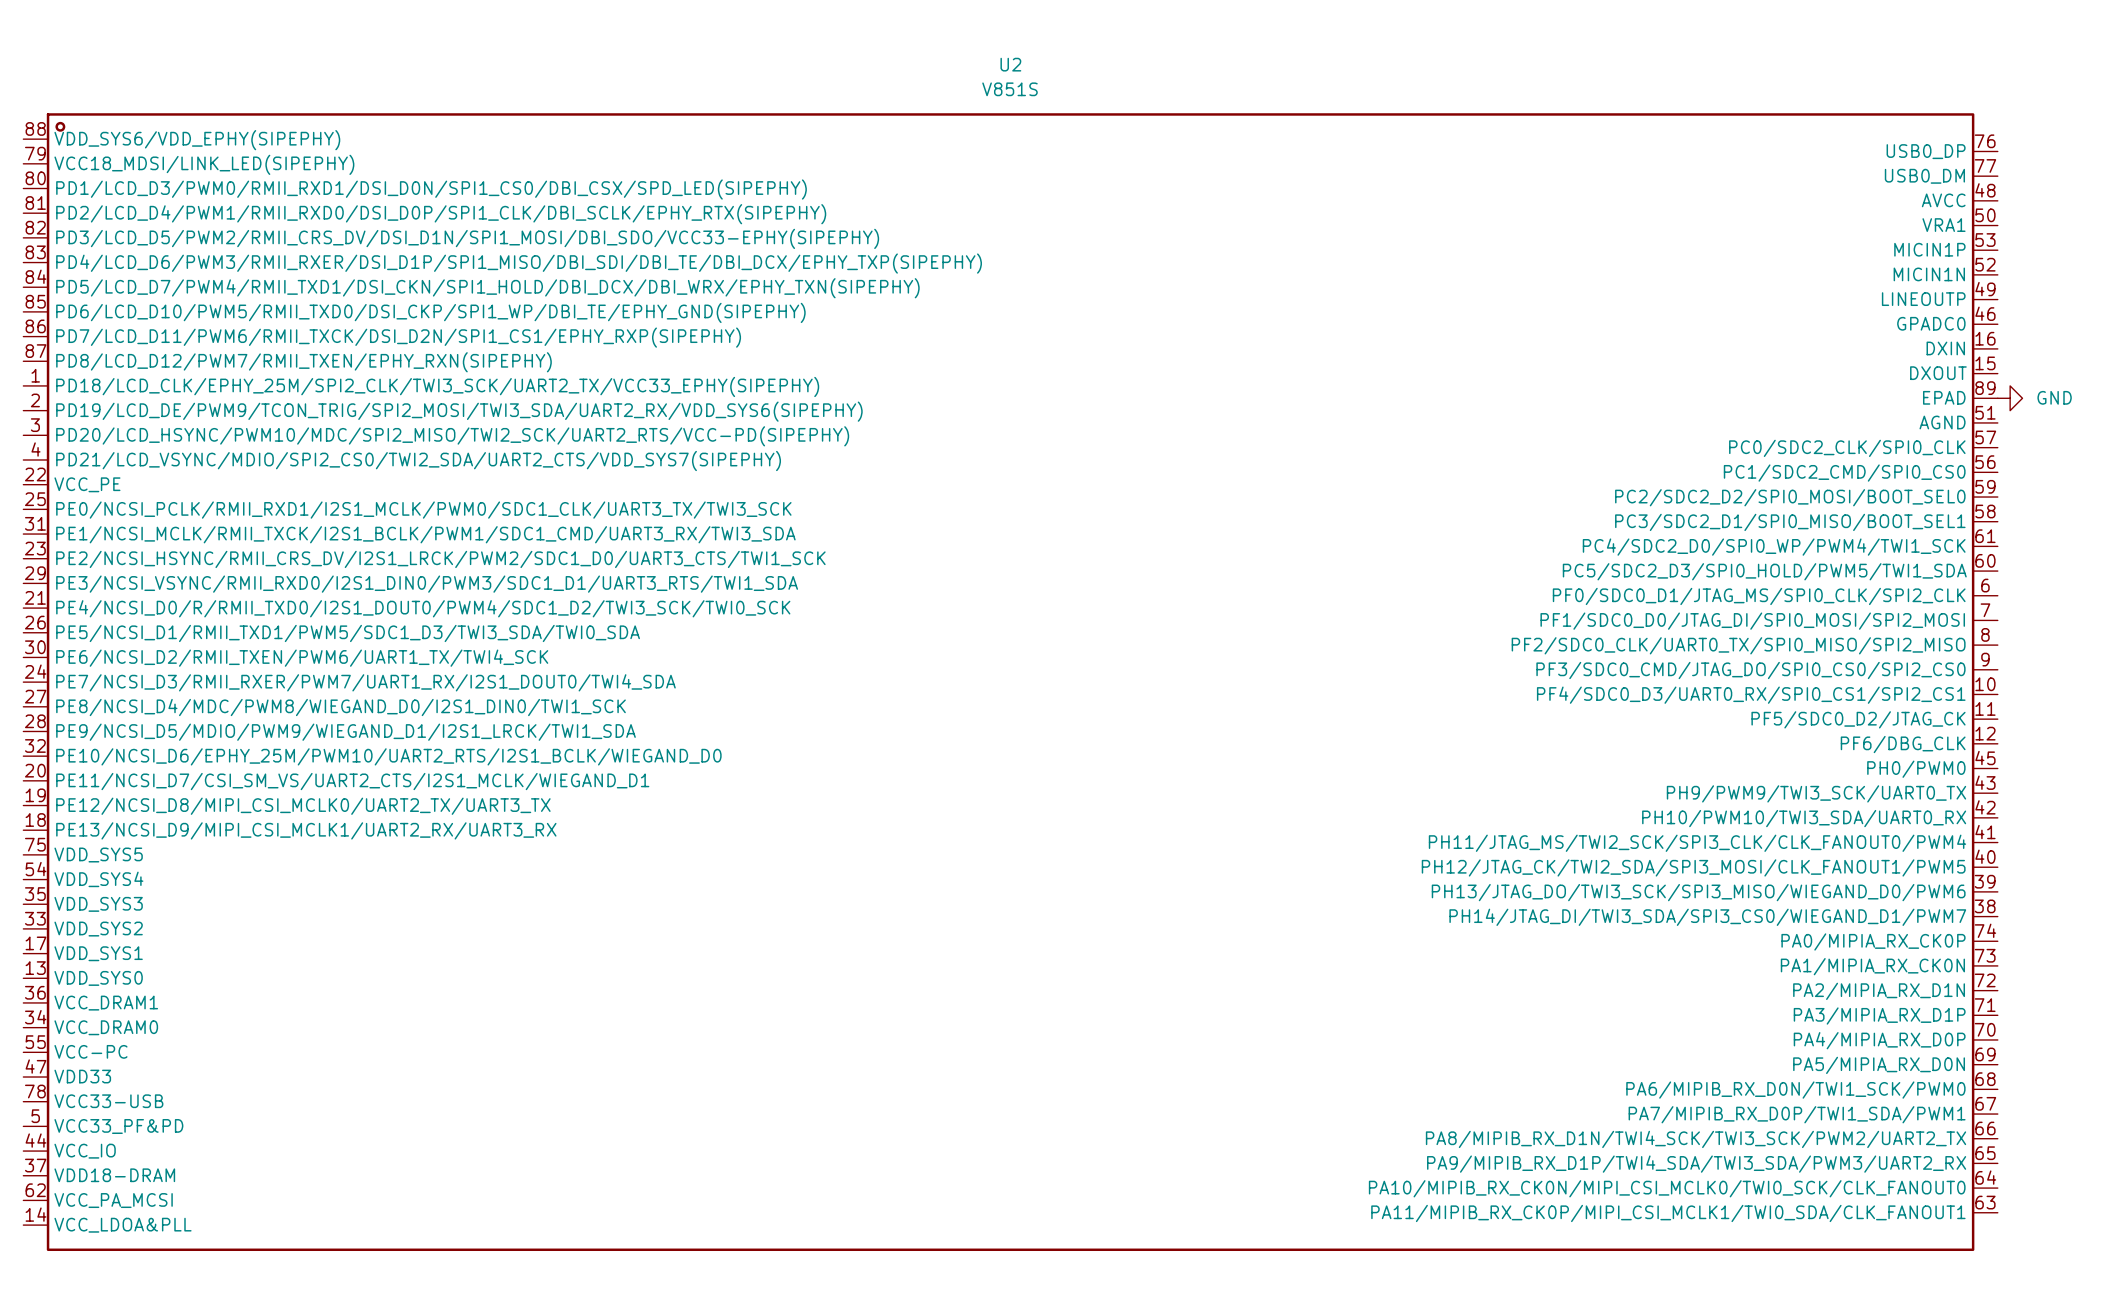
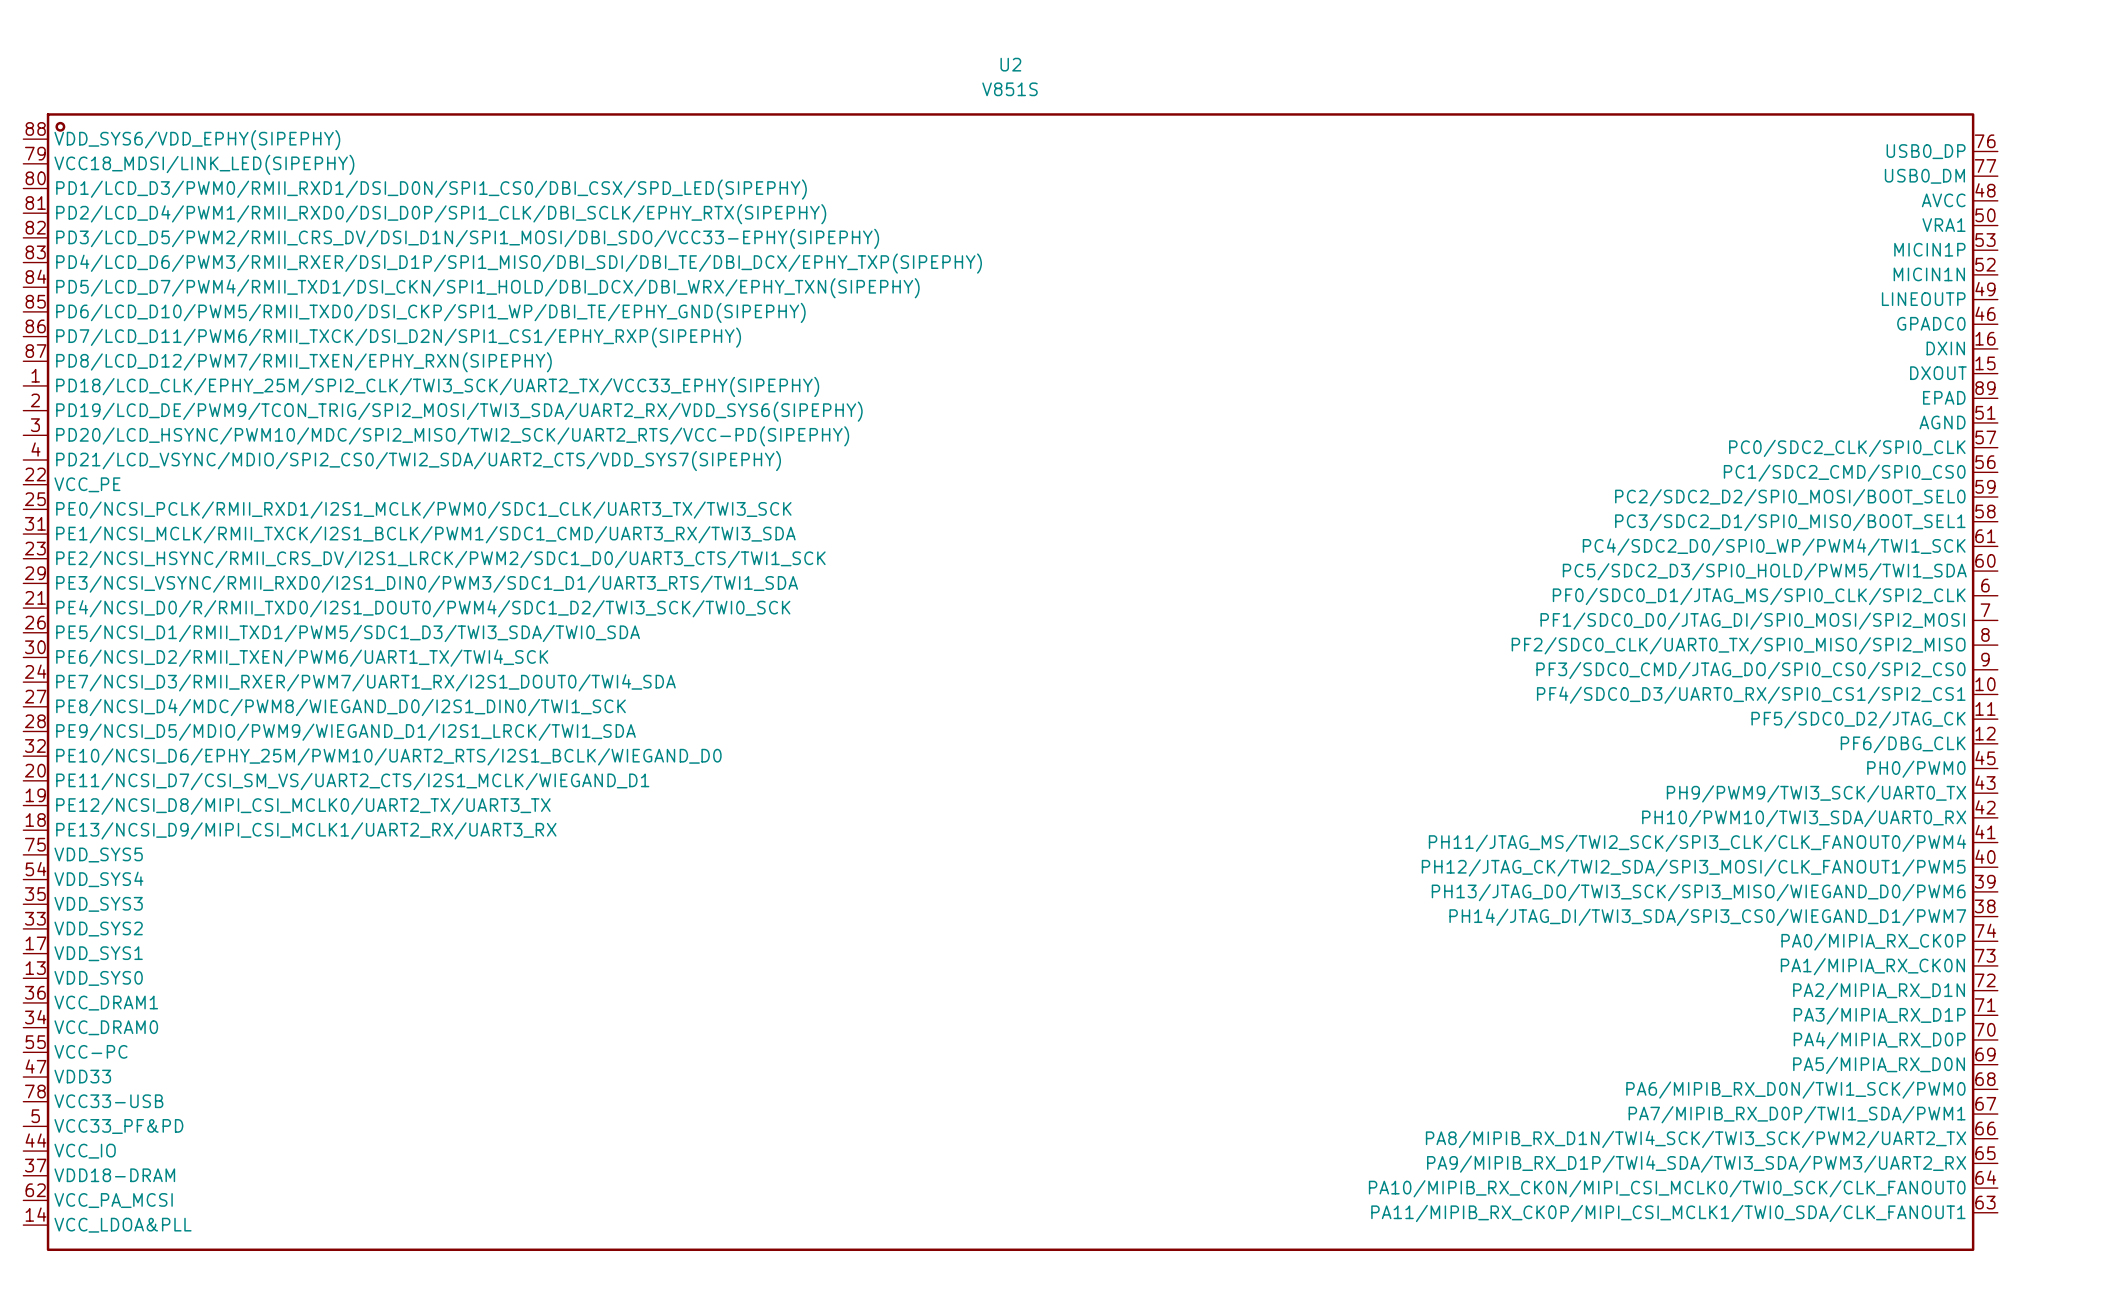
power symbol: GND (2010, 398) -> none

